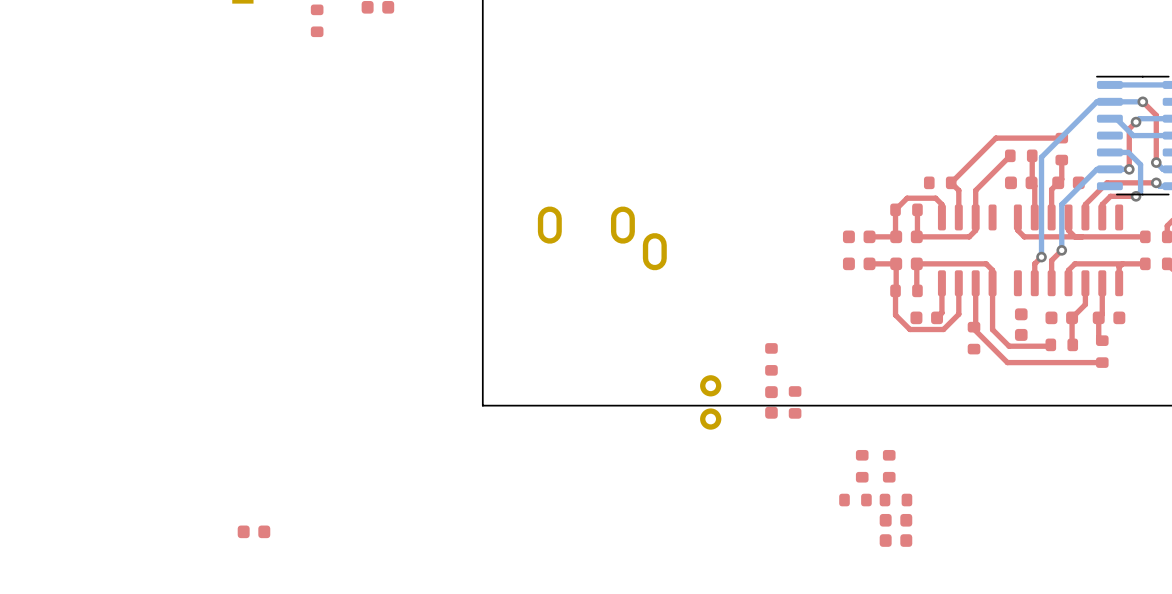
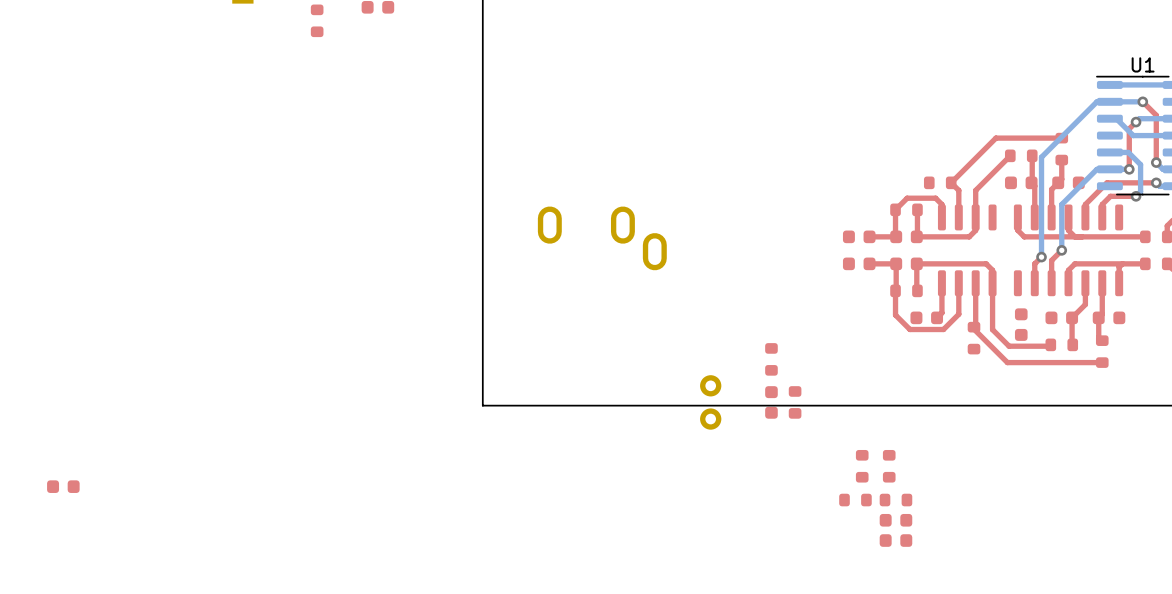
U1 name: none -> U1 (1143, 64)
part position: (253, 531) -> (63, 486)

